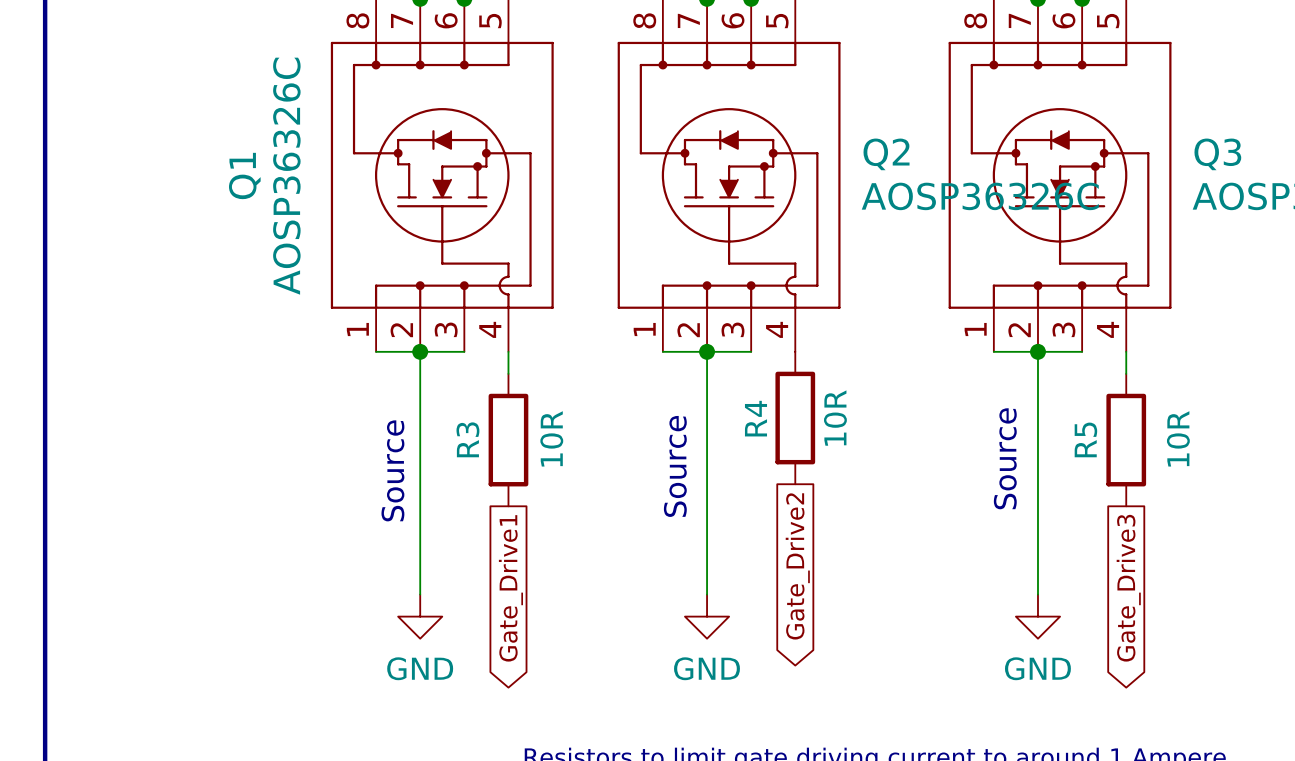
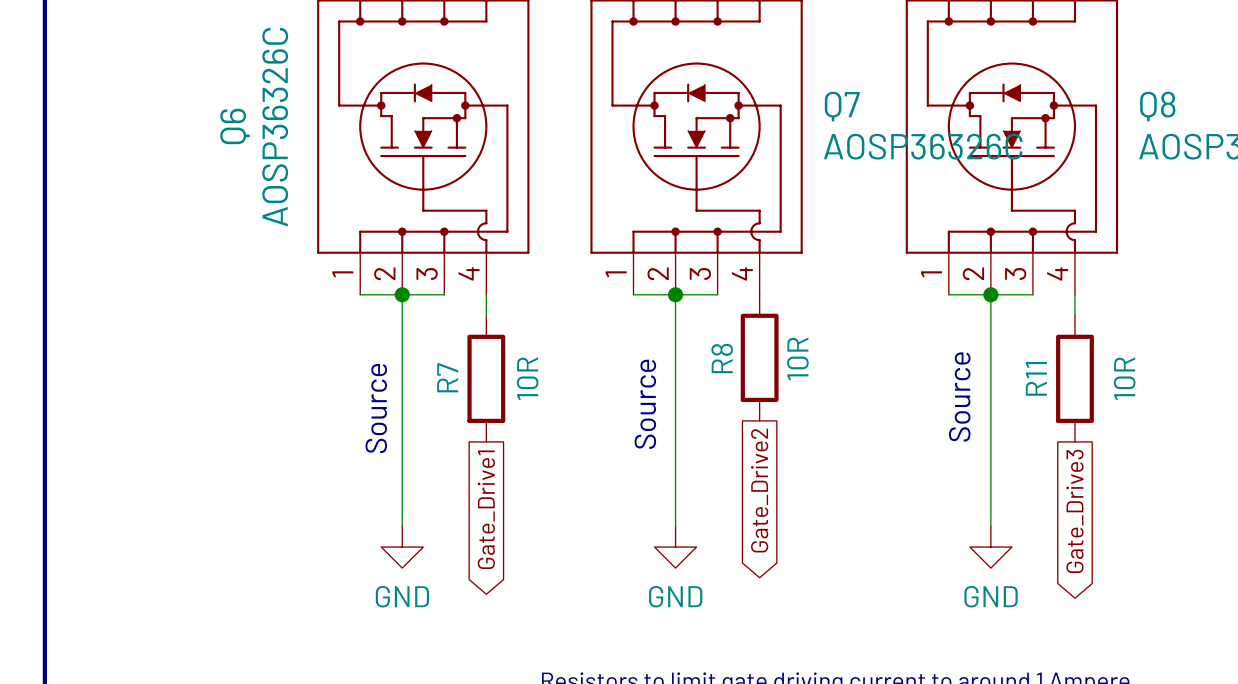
Q2 name: Q2 (886, 154) -> Q7 (842, 106)
Q3 name: Q3 (1217, 154) -> Q8 (1157, 106)
Q1 name: Q1 (244, 175) -> Q6 (235, 126)
R4 name: R4 (755, 418) -> R8 (722, 358)
R3 name: R3 (467, 439) -> R7 (447, 377)
R5 name: R5 (1085, 439) -> R11 (1036, 378)

